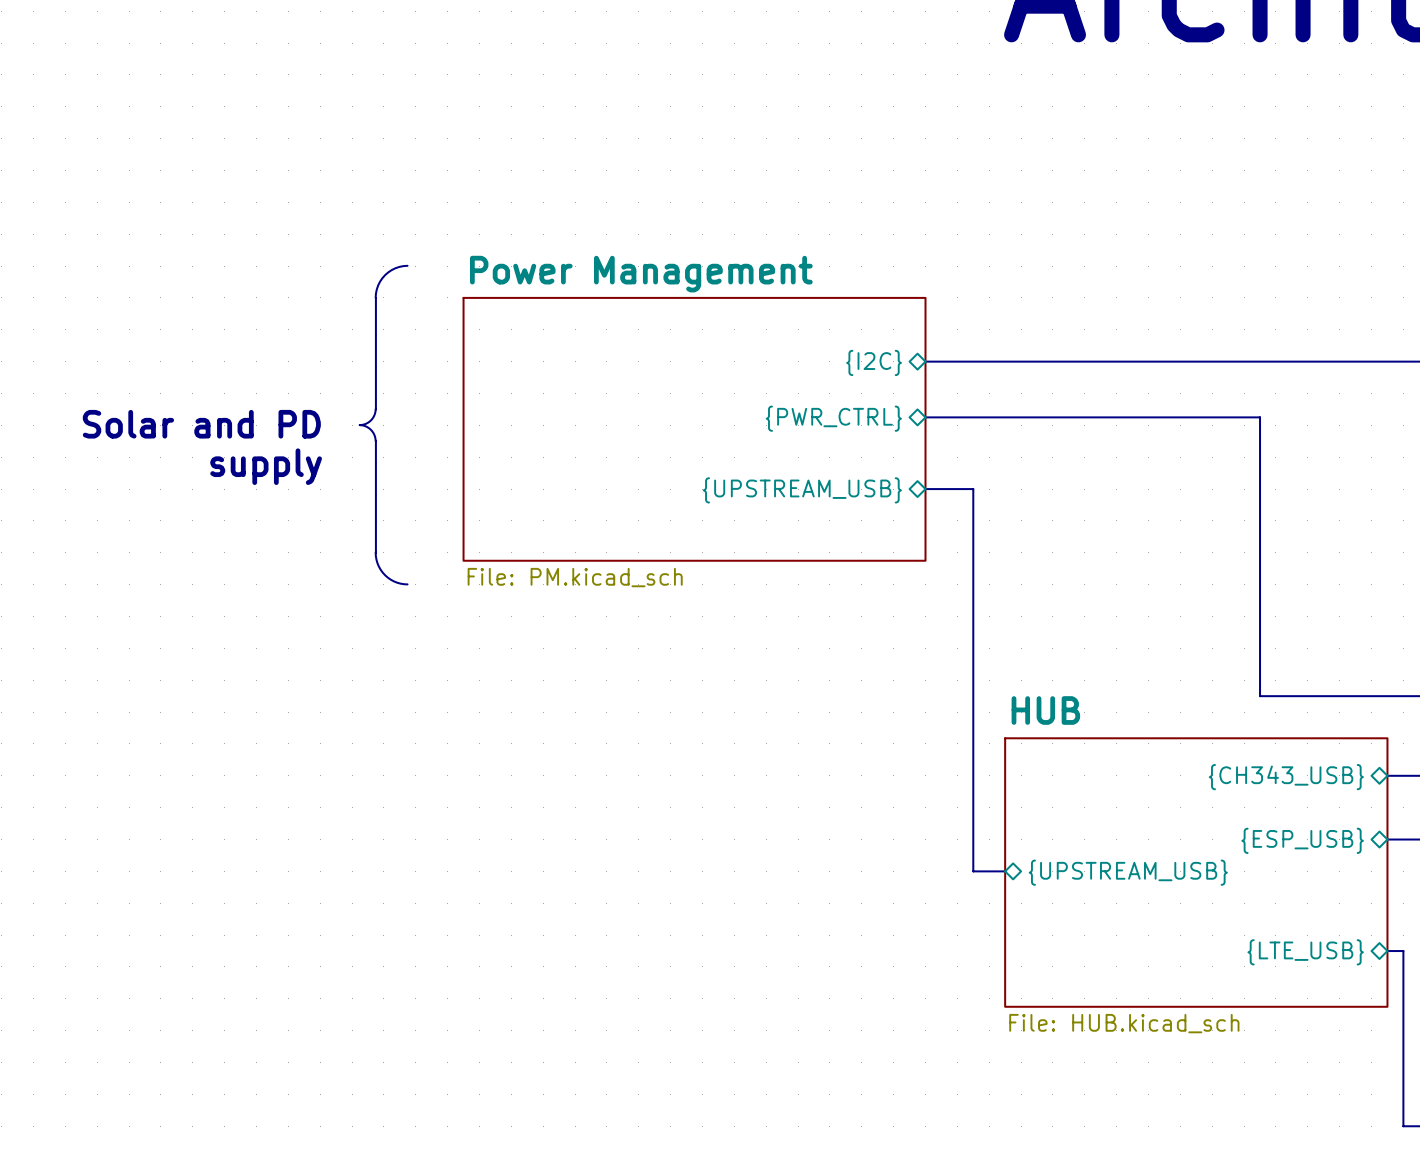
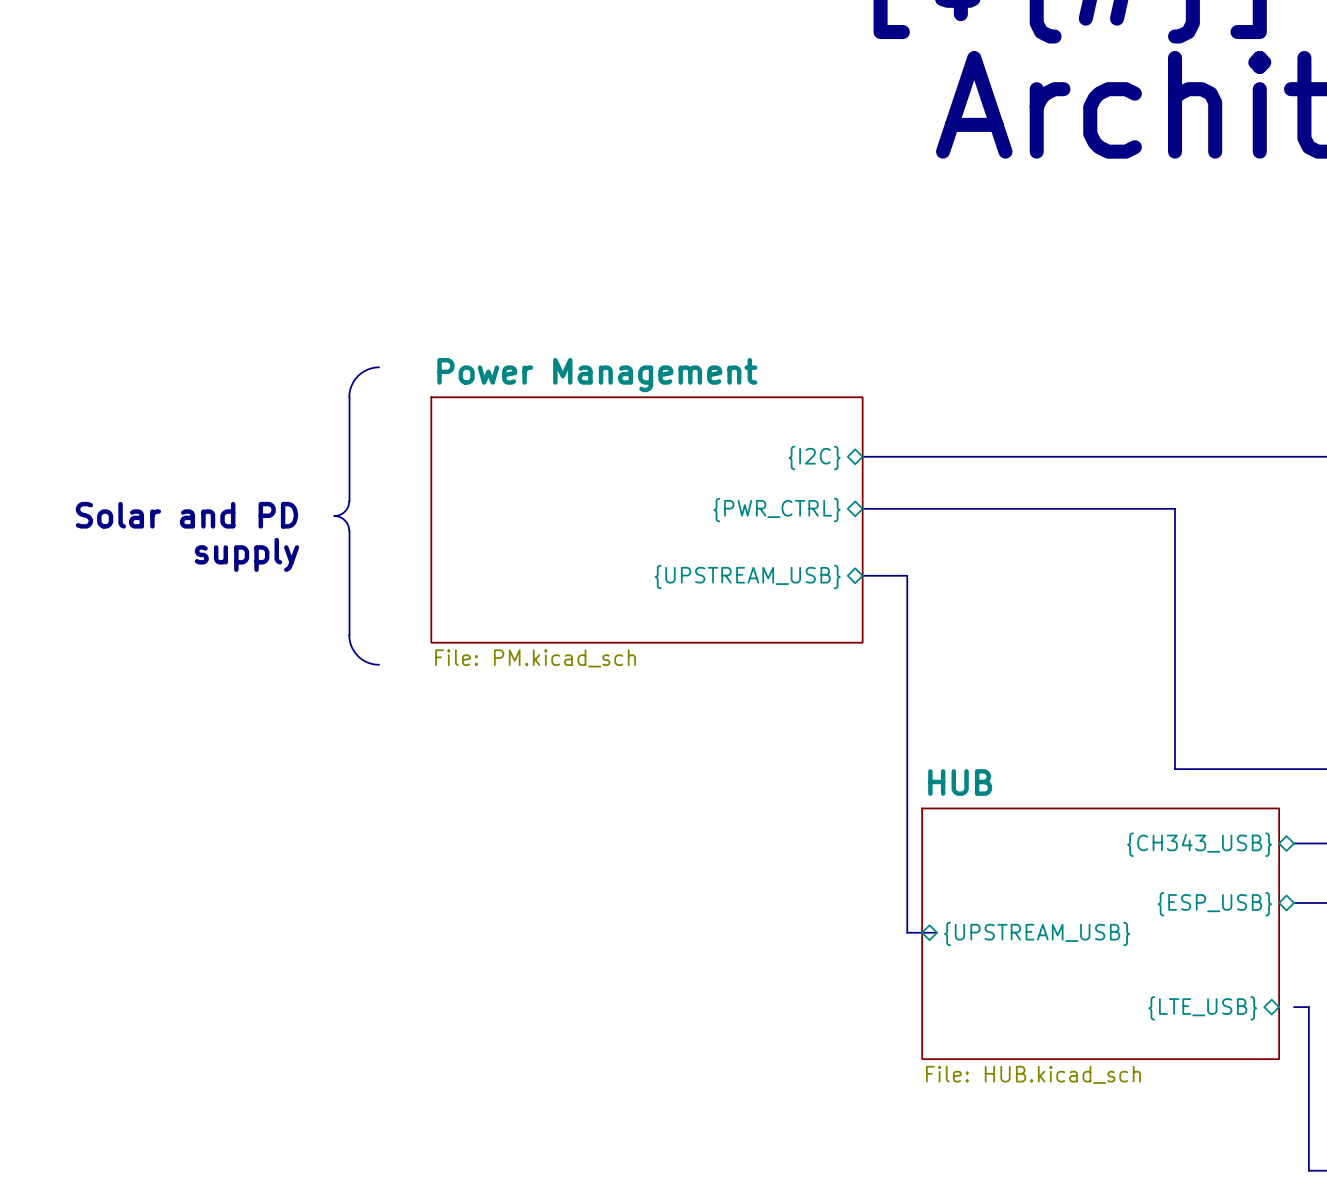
sheet pin position: {UPSTREAM_USB} (1128, 872) -> {UPSTREAM_USB} (1037, 933)
sheet HUB position: (1196, 872) -> (1100, 933)
sheet pin position: {LTE_USB} (1305, 952) -> {LTE_USB} (1202, 1008)

